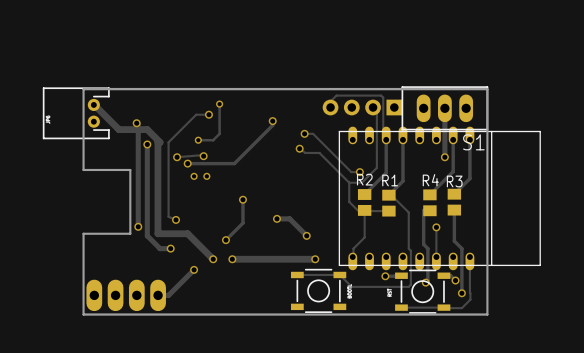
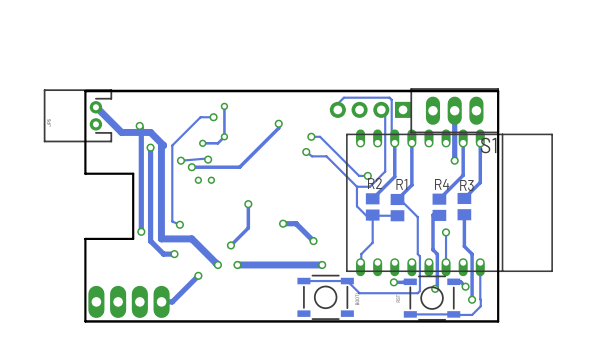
via: none -> (224, 136)

